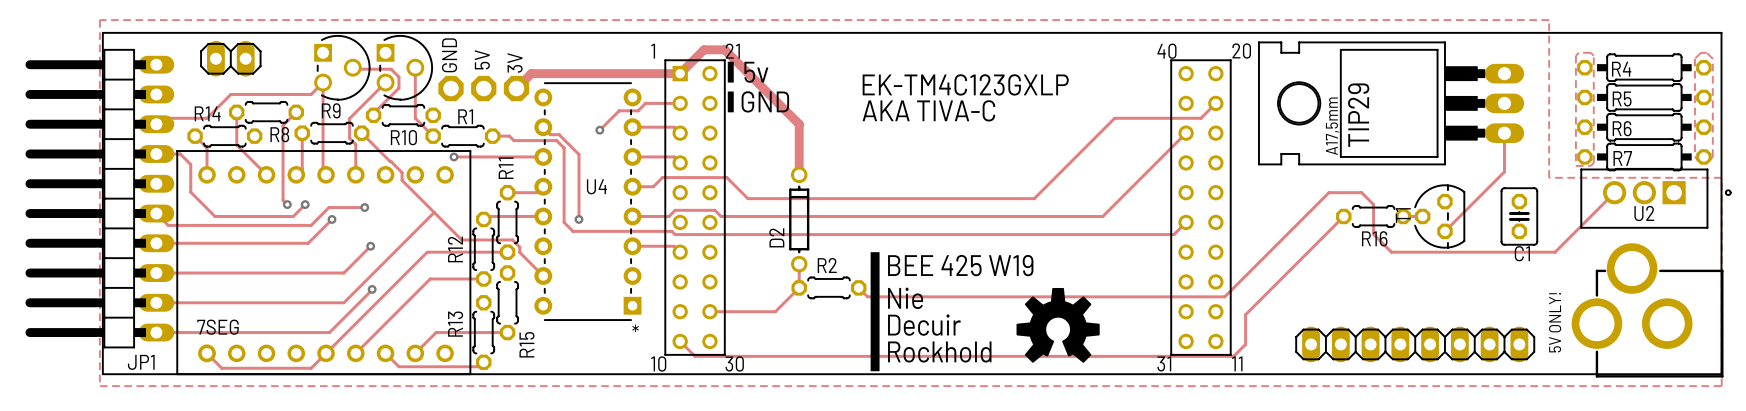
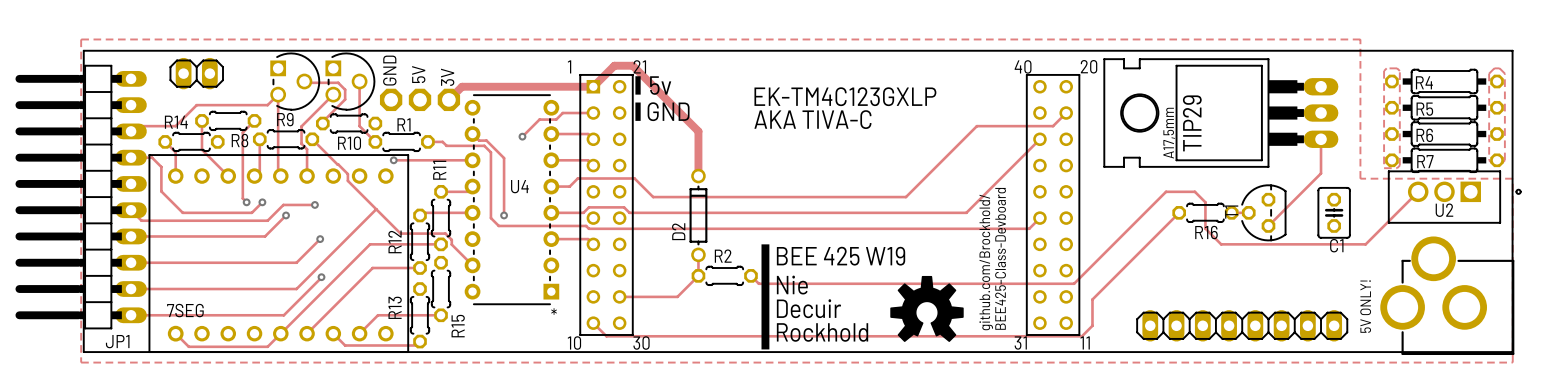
text: none -> BEE425-Class-Devboard (1000, 258)
text: none -> github.com/Brockhold/ (986, 262)

